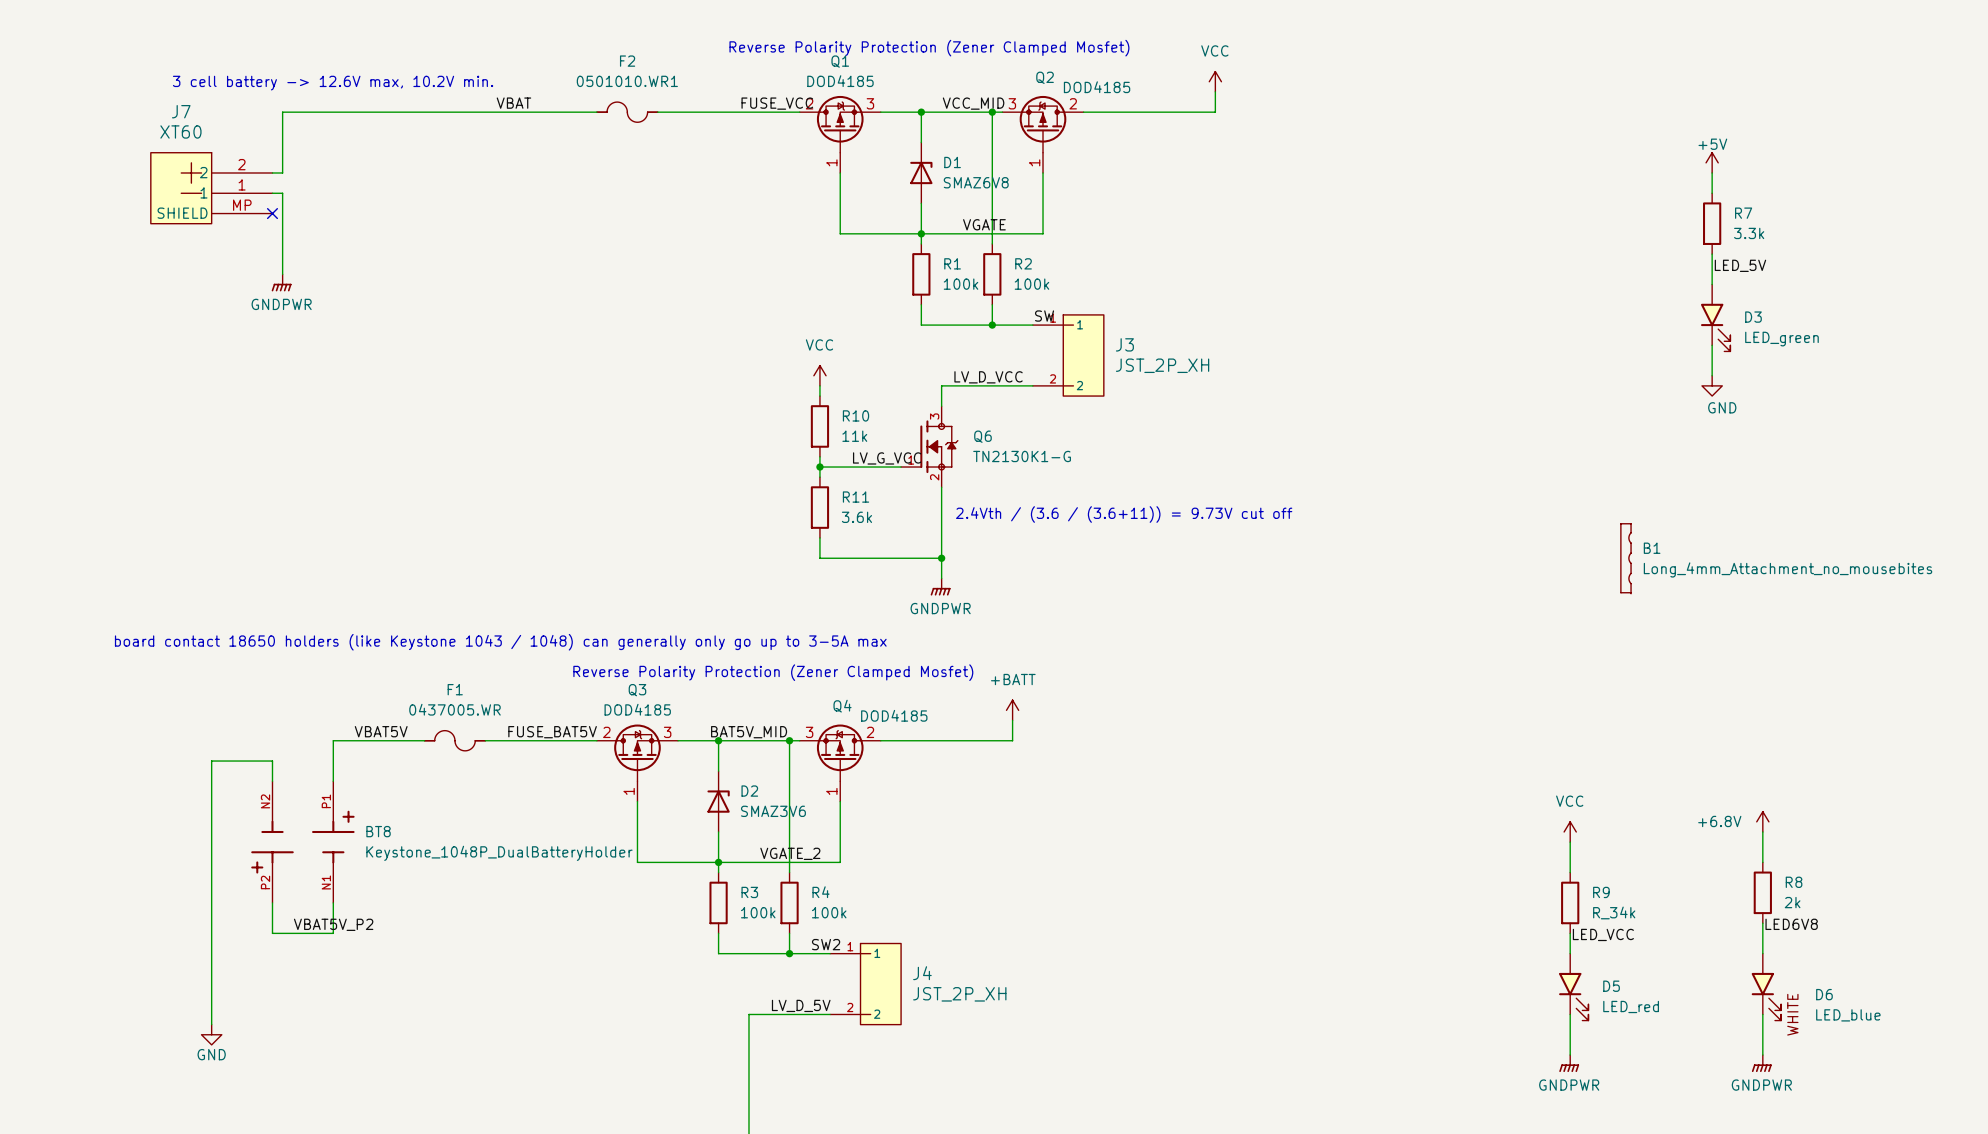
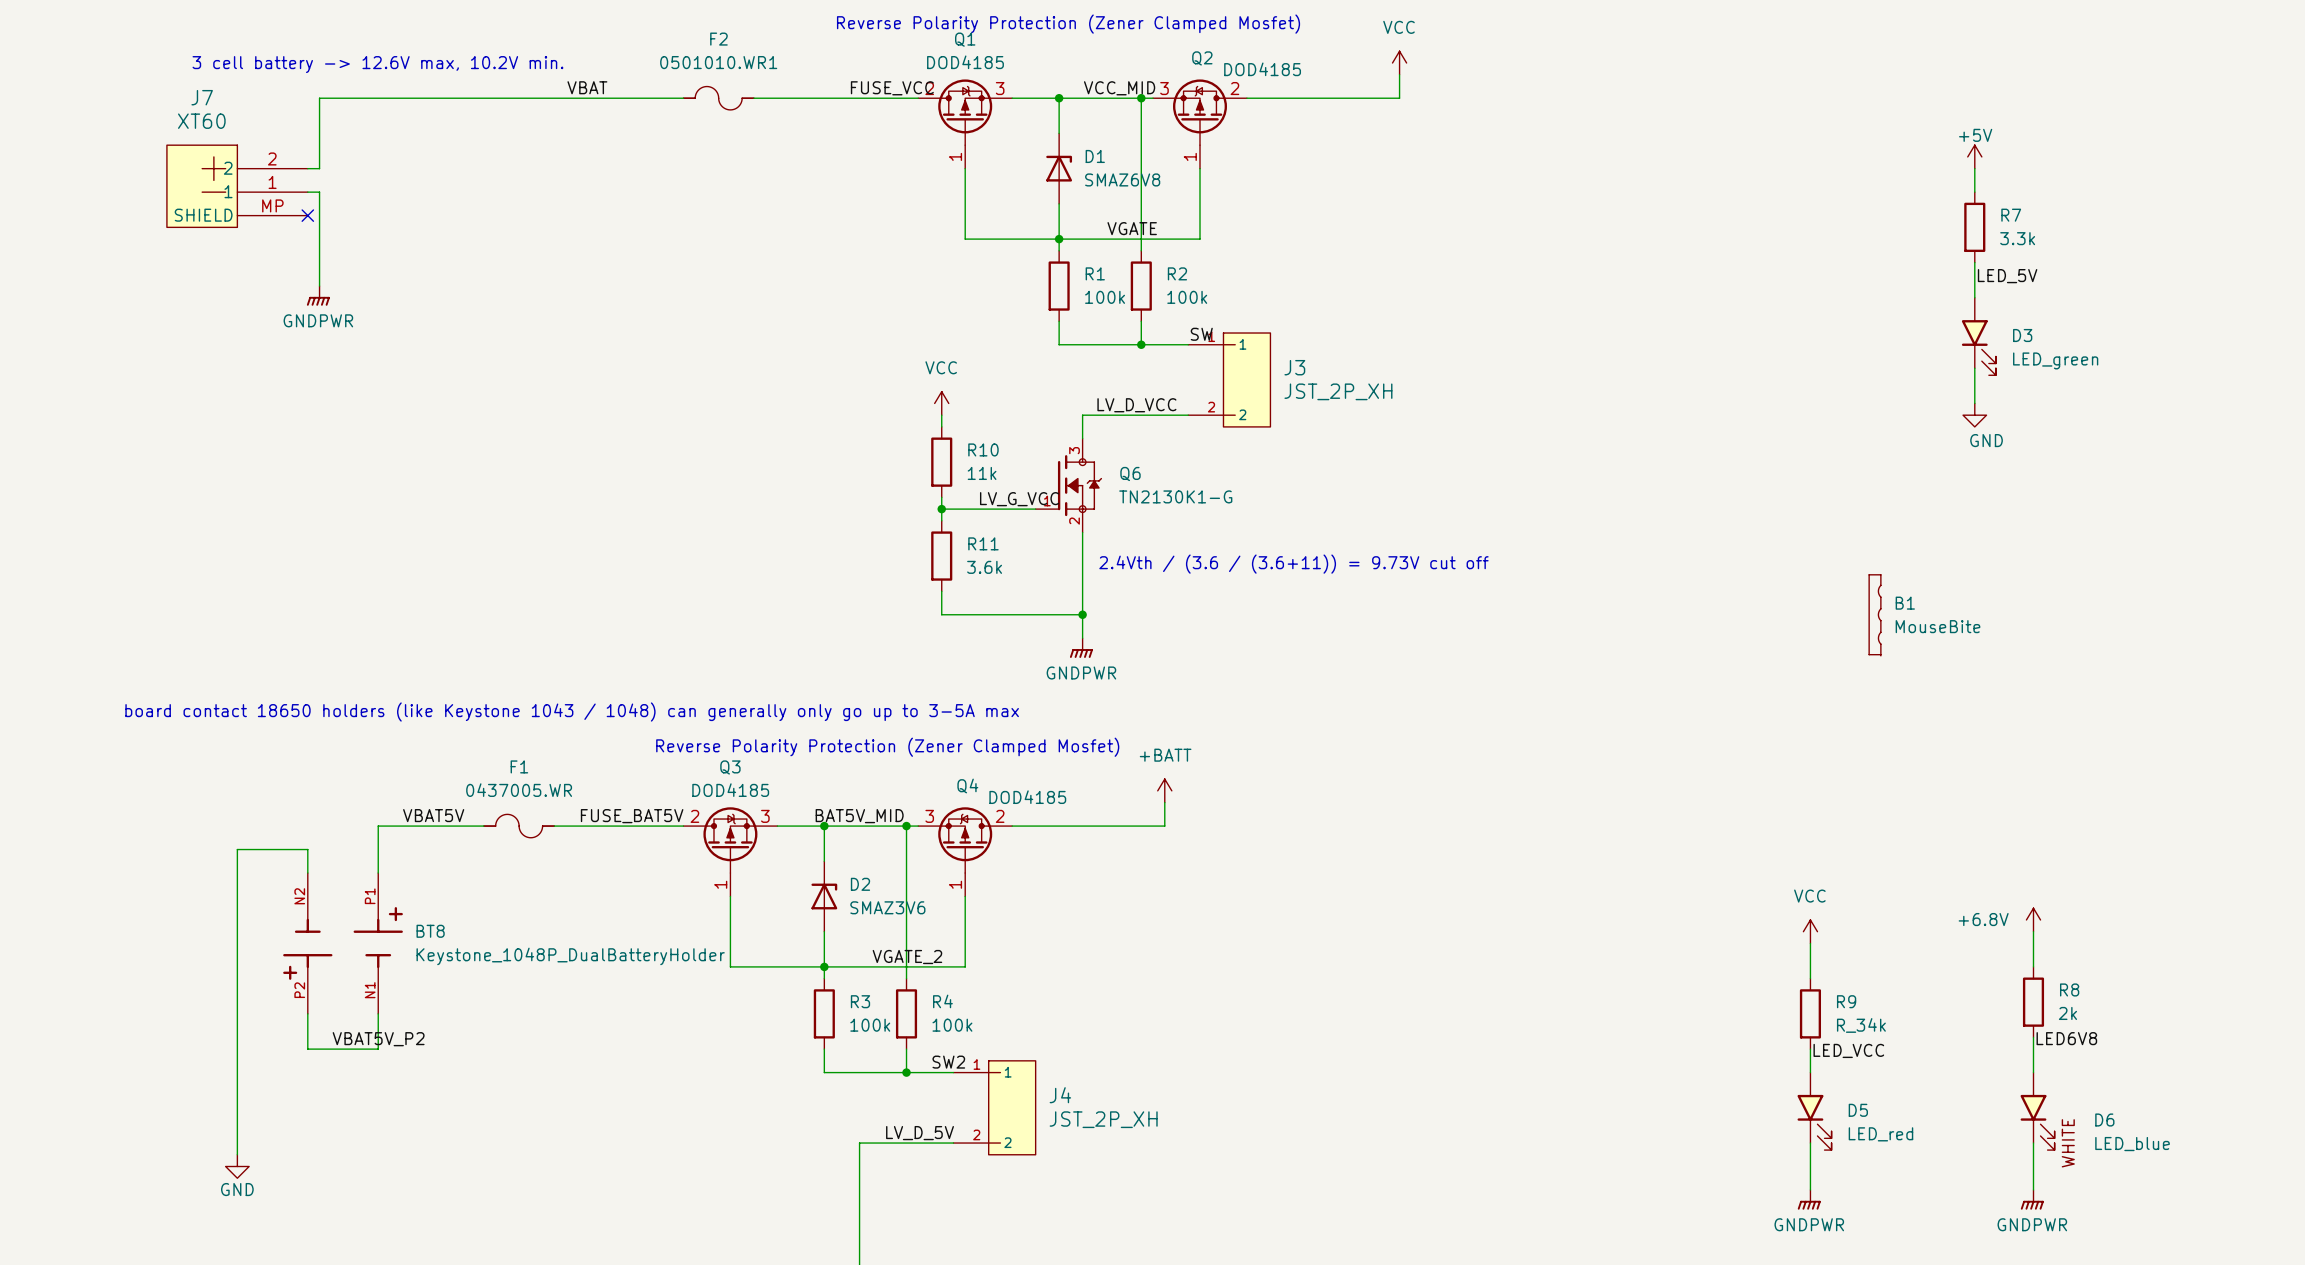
B1 value: Long_4mm_Attachment_no_mousebites (1788, 569) -> MouseBite (1937, 626)

